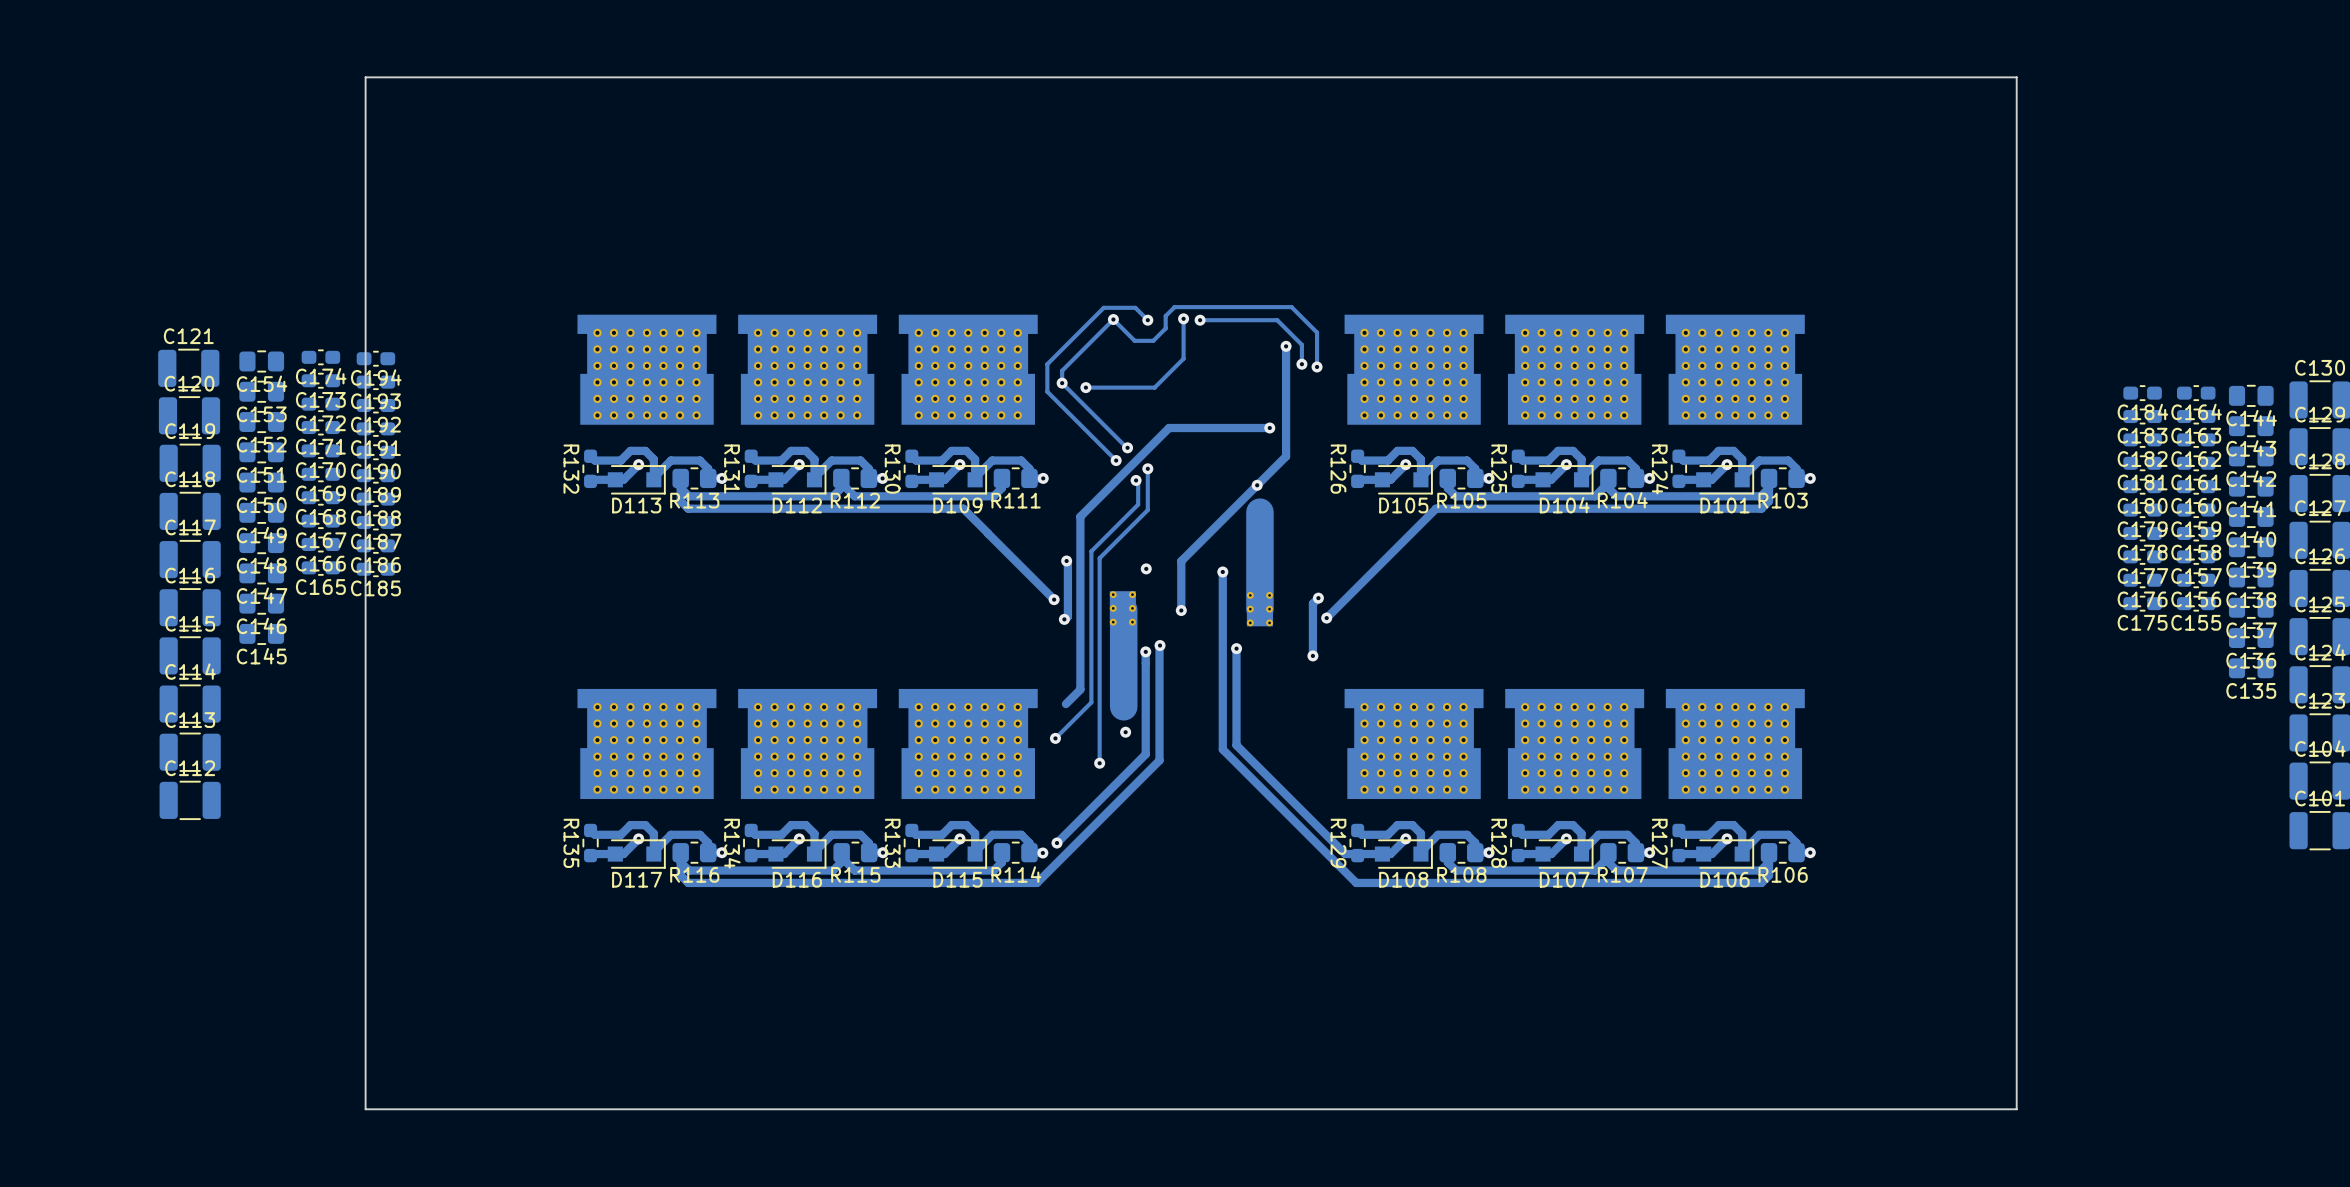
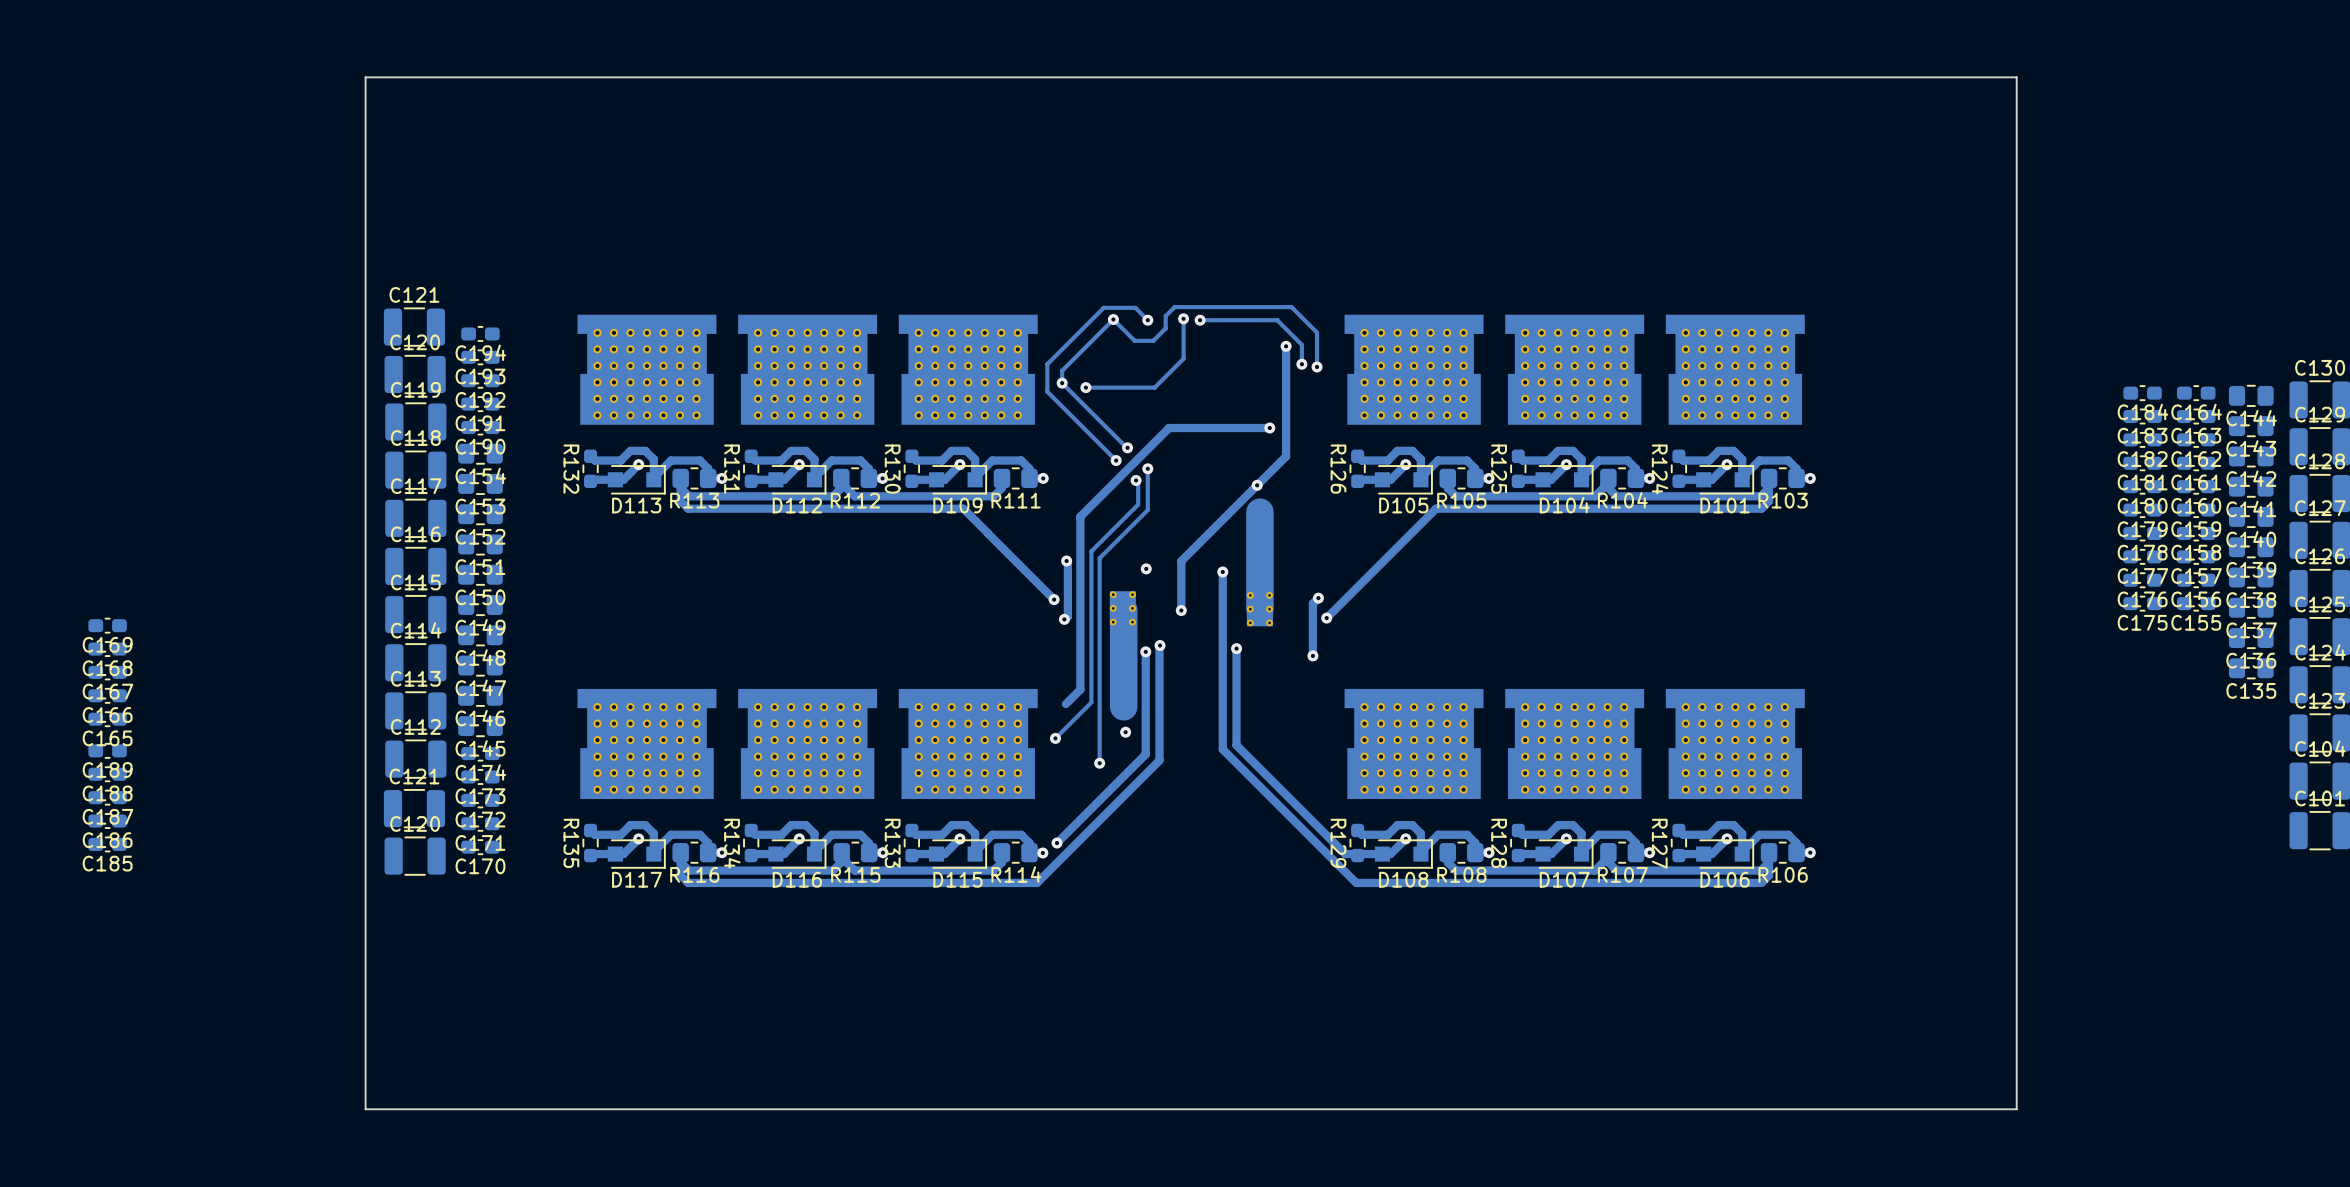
C174 position: (320, 357) -> (480, 753)
C194 position: (375, 358) -> (480, 333)
C154 position: (261, 361) -> (480, 453)
C121 position: (188, 368) -> (414, 327)
C173 position: (320, 380) -> (480, 777)
C193 position: (375, 382) -> (480, 357)
C153 position: (261, 391) -> (480, 483)
C172 position: (320, 404) -> (480, 800)
C192 position: (375, 405) -> (480, 380)
C120 position: (189, 415) -> (415, 374)
C152 position: (261, 422) -> (480, 514)
C171 position: (320, 427) -> (480, 823)
C191 position: (375, 428) -> (480, 404)
C170 position: (320, 450) -> (480, 847)
C151 position: (261, 452) -> (480, 544)
C190 position: (375, 452) -> (480, 427)
C119 position: (190, 463) -> (415, 422)
C169 position: (320, 474) -> (107, 625)
C189 position: (375, 475) -> (107, 750)
C150 position: (261, 482) -> (480, 574)
C168 position: (320, 497) -> (107, 649)
C188 position: (375, 499) -> (107, 774)
C118 position: (190, 511) -> (415, 470)
C149 position: (261, 512) -> (480, 605)
C167 position: (320, 521) -> (107, 672)
C187 position: (375, 522) -> (107, 797)
C148 position: (261, 543) -> (480, 635)
C166 position: (320, 544) -> (107, 695)
C186 position: (375, 545) -> (107, 821)
C117 position: (190, 559) -> (415, 518)
C165 position: (320, 567) -> (107, 719)
C185 position: (375, 569) -> (107, 844)
C147 position: (261, 573) -> (480, 665)
C146 position: (261, 603) -> (480, 695)
C116 position: (190, 607) -> (415, 566)
C145 position: (261, 633) -> (480, 726)
C115 position: (190, 655) -> (415, 614)
C114 position: (190, 704) -> (415, 662)
C113 position: (190, 752) -> (415, 710)
C112 position: (190, 800) -> (415, 759)
C121: none -> (414, 808)
C120: none -> (415, 856)

